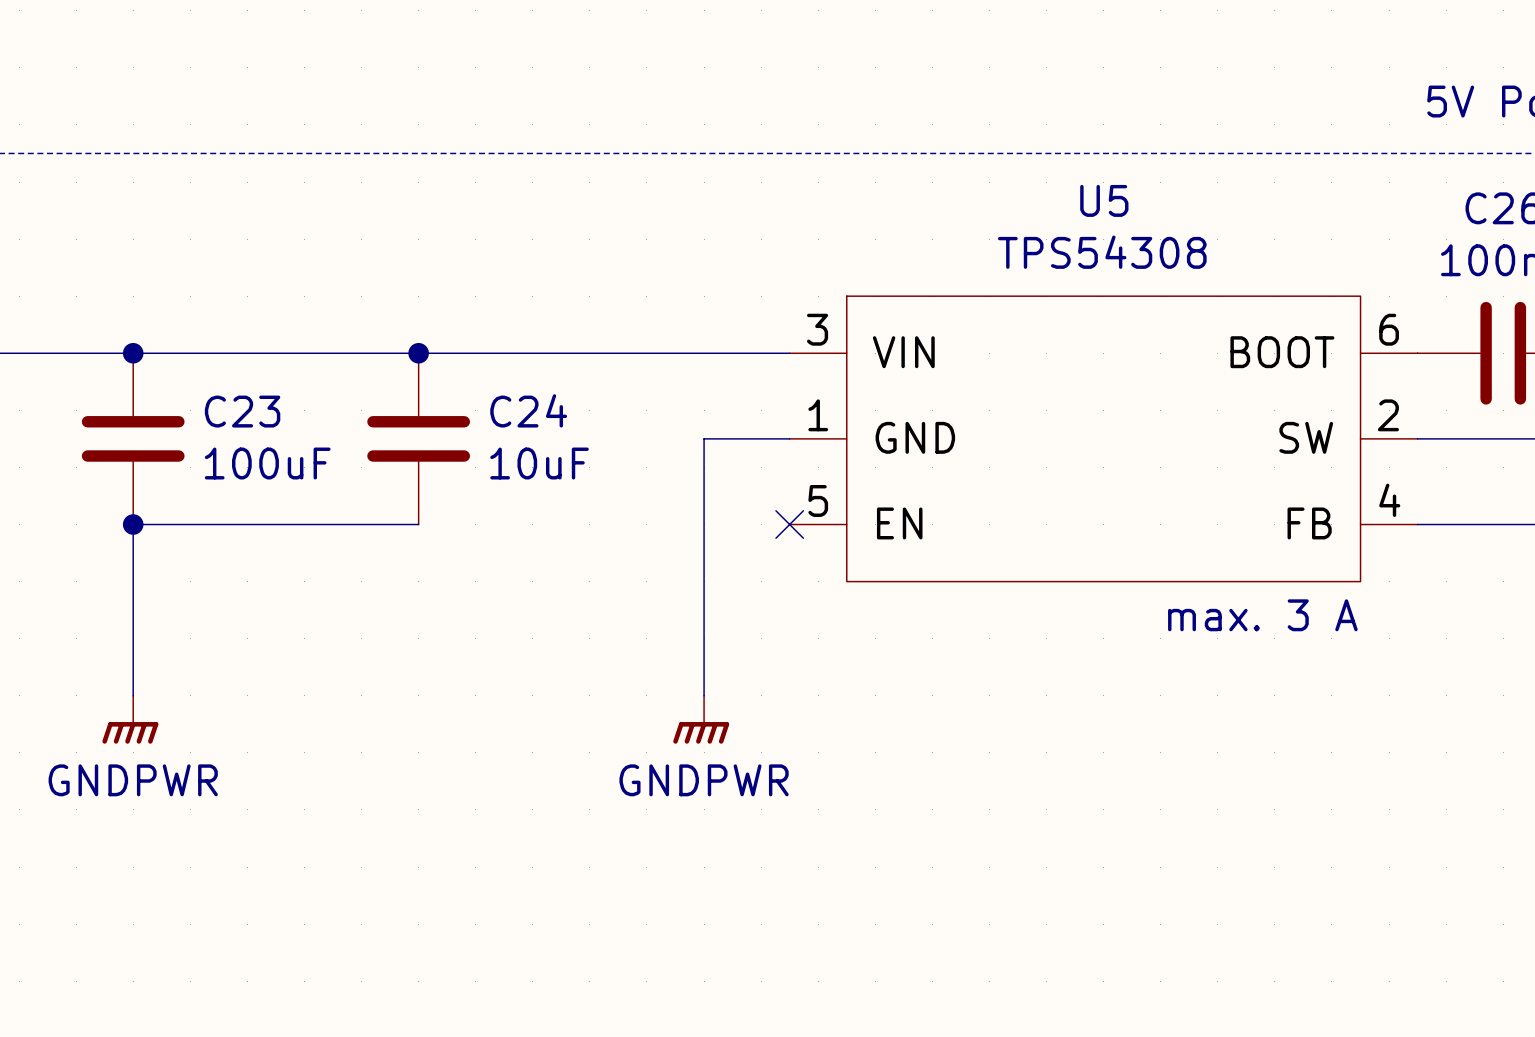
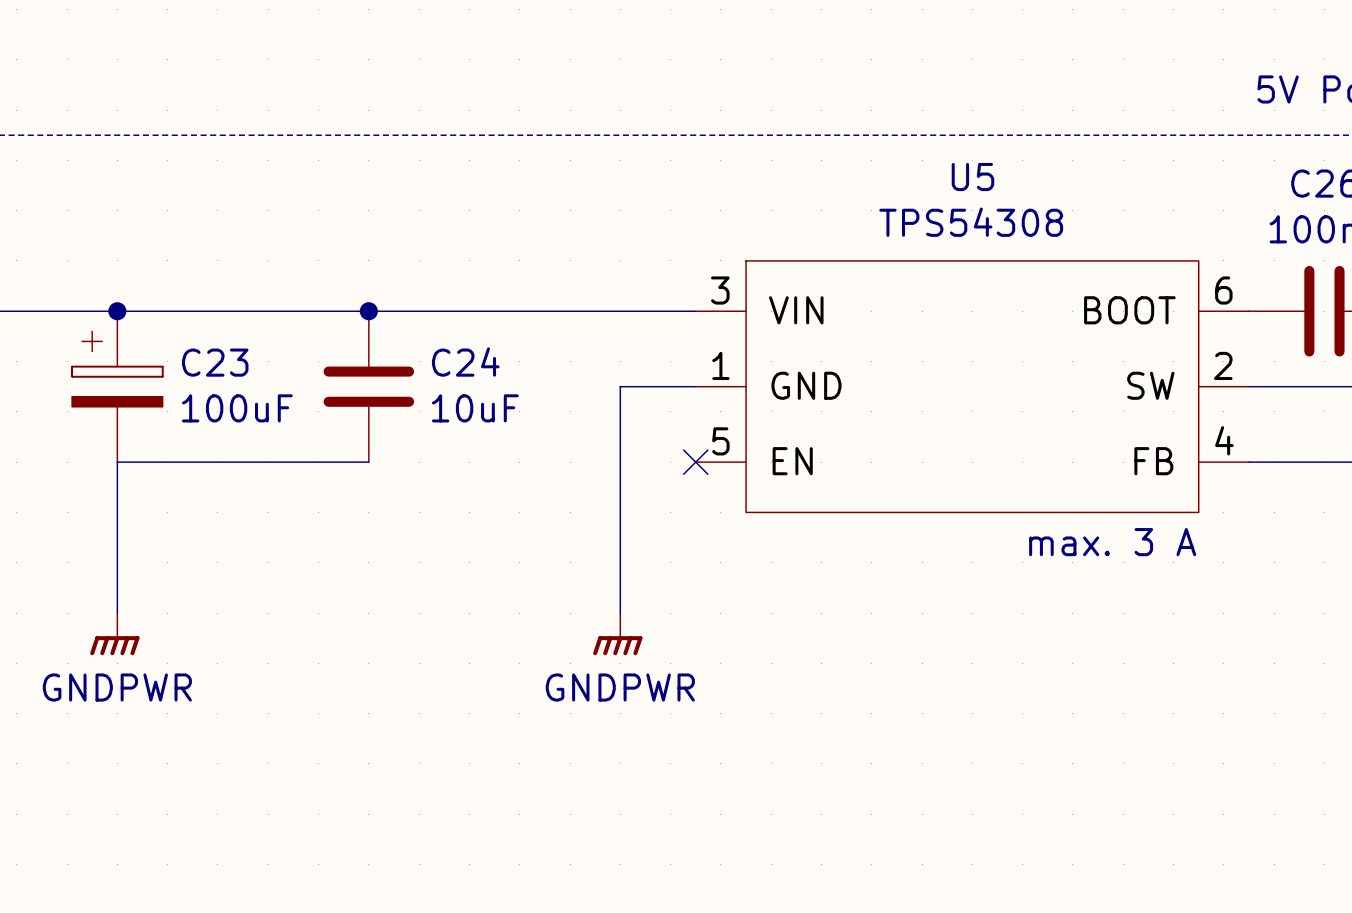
C23 symbol: [81, 353, 185, 525] -> [72, 311, 163, 463]
junction: (133, 524) -> none

